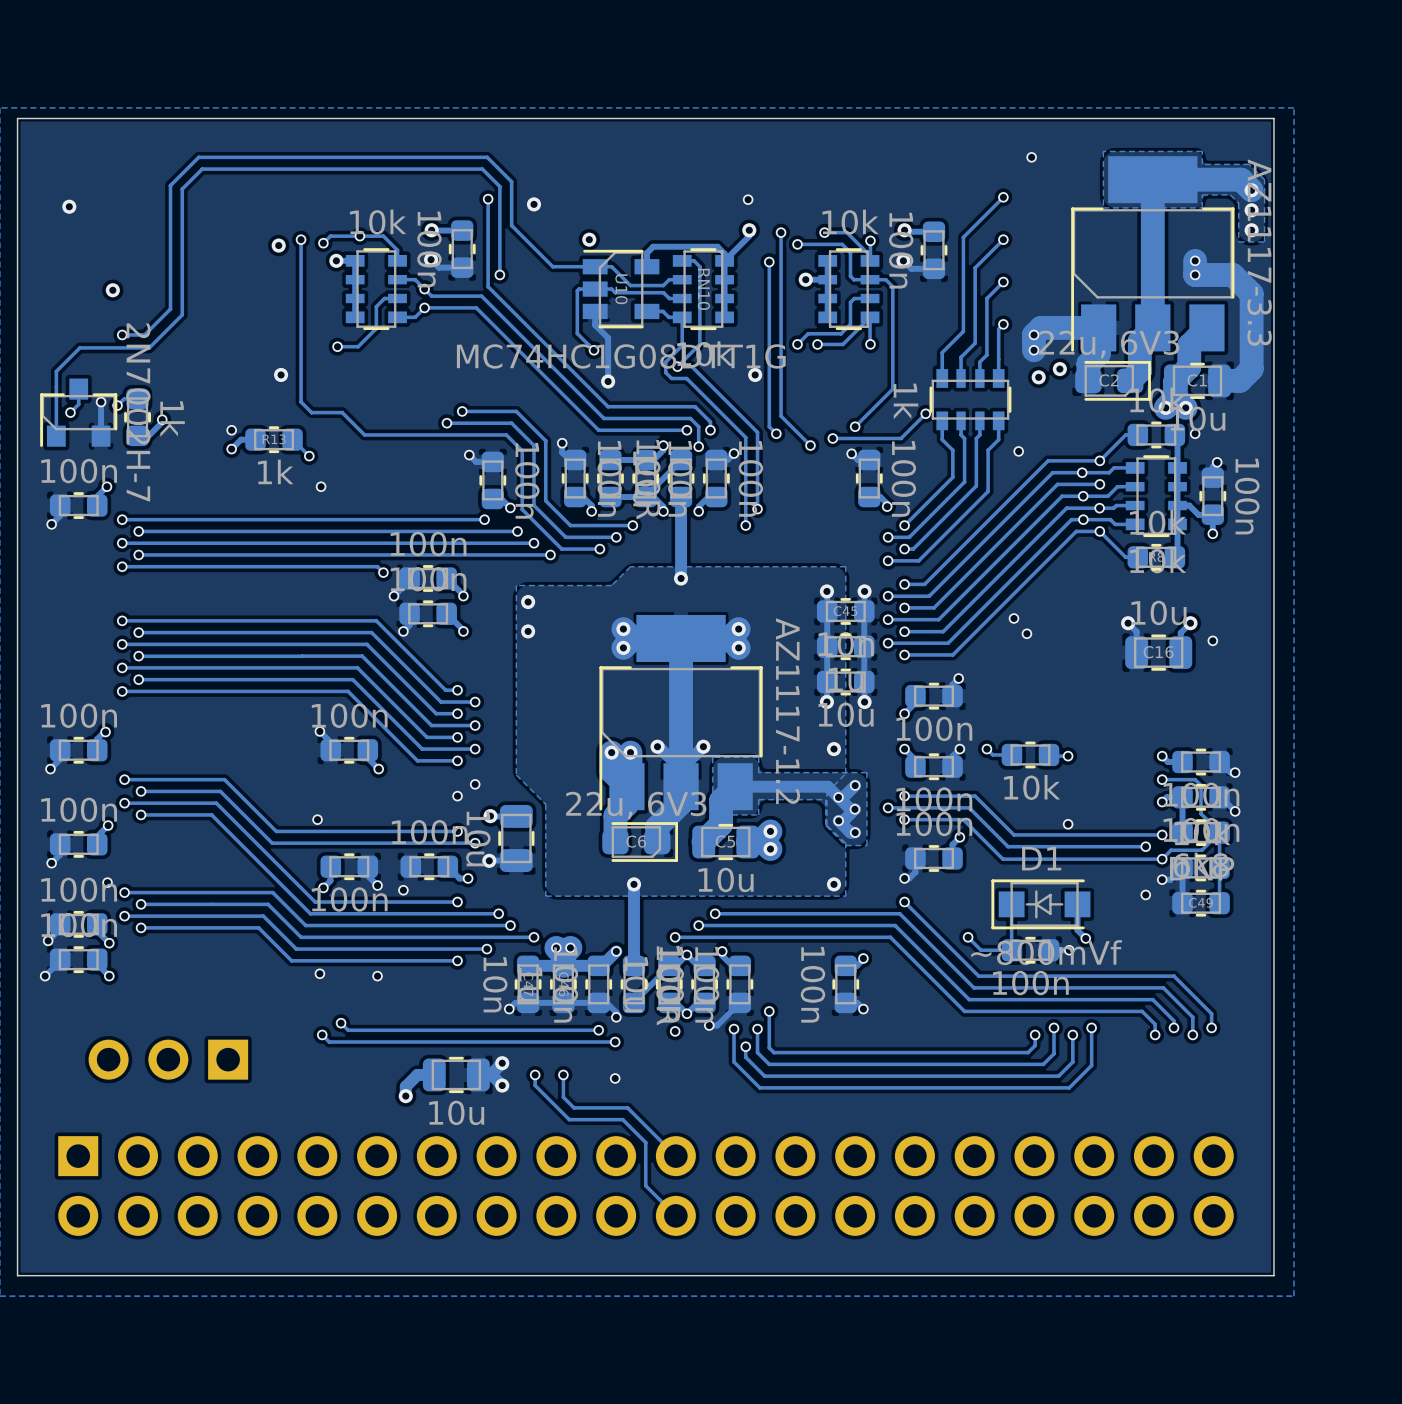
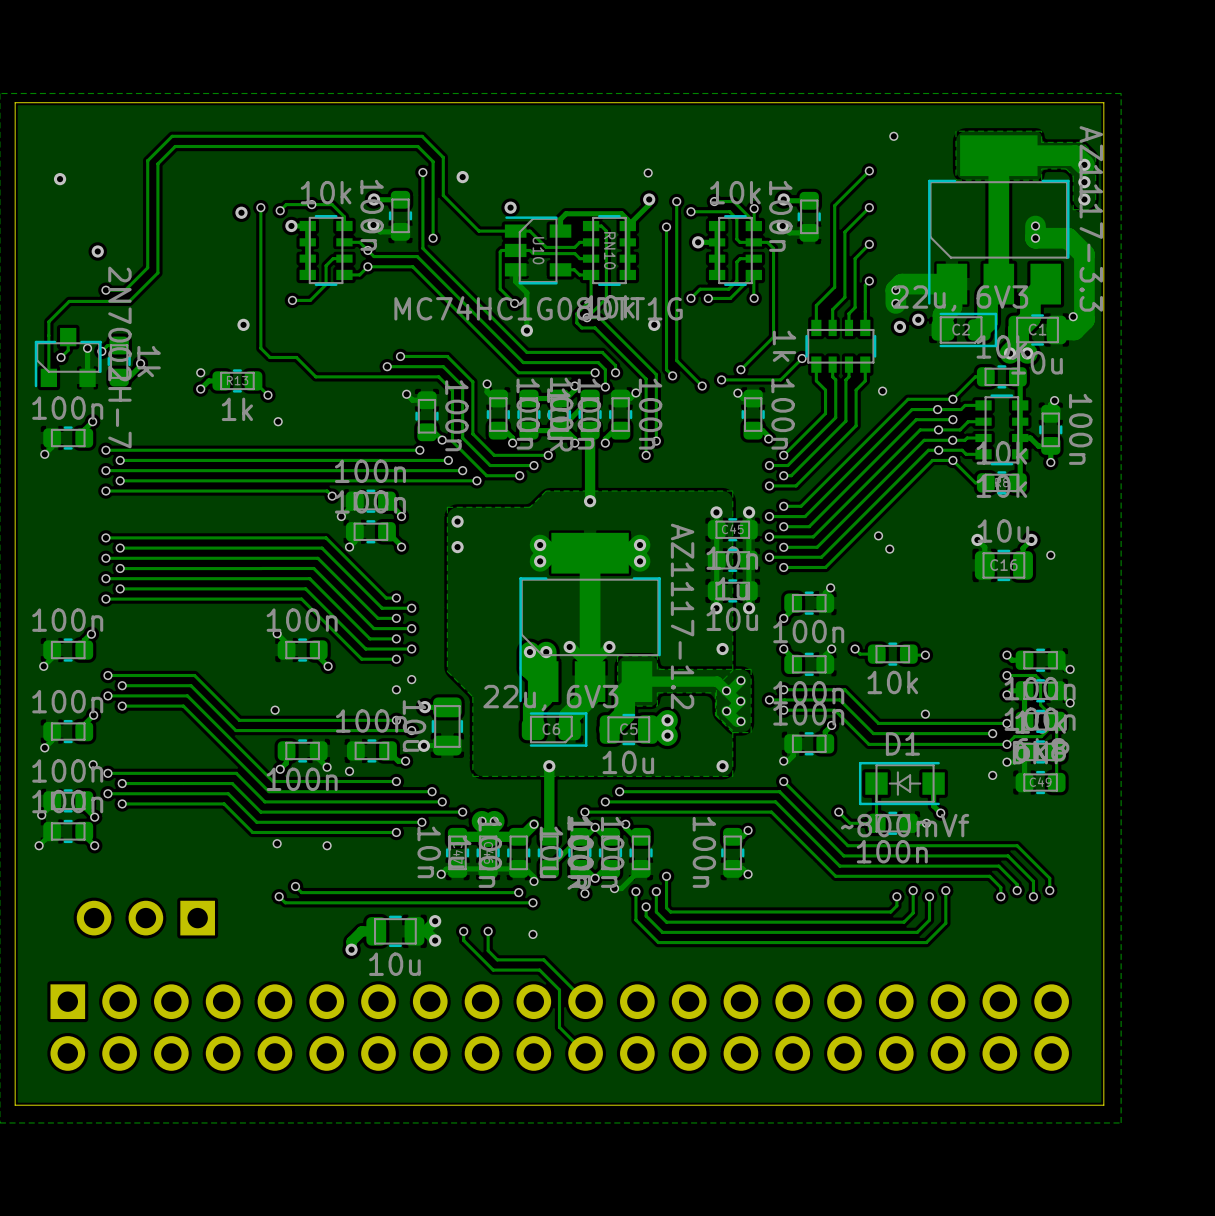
via position: (1195, 433) -> (1073, 316)

